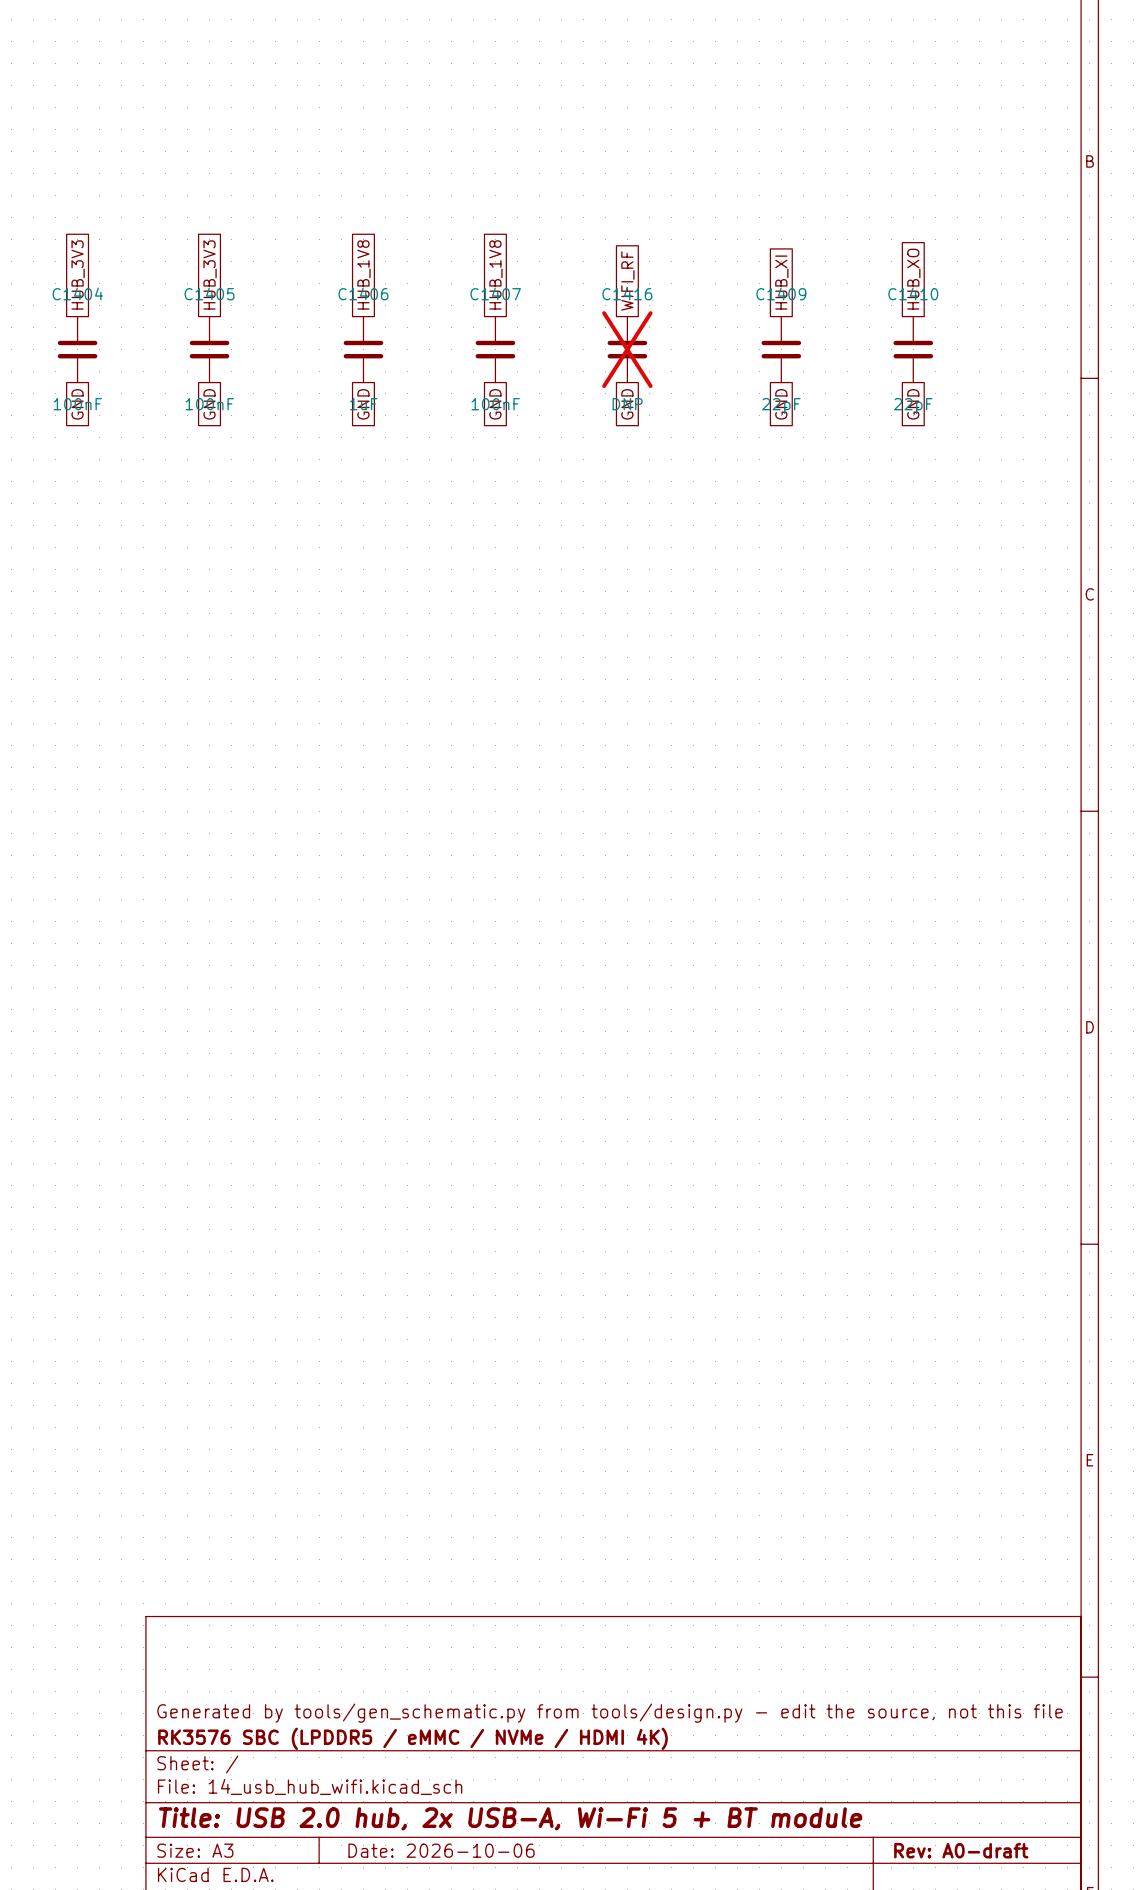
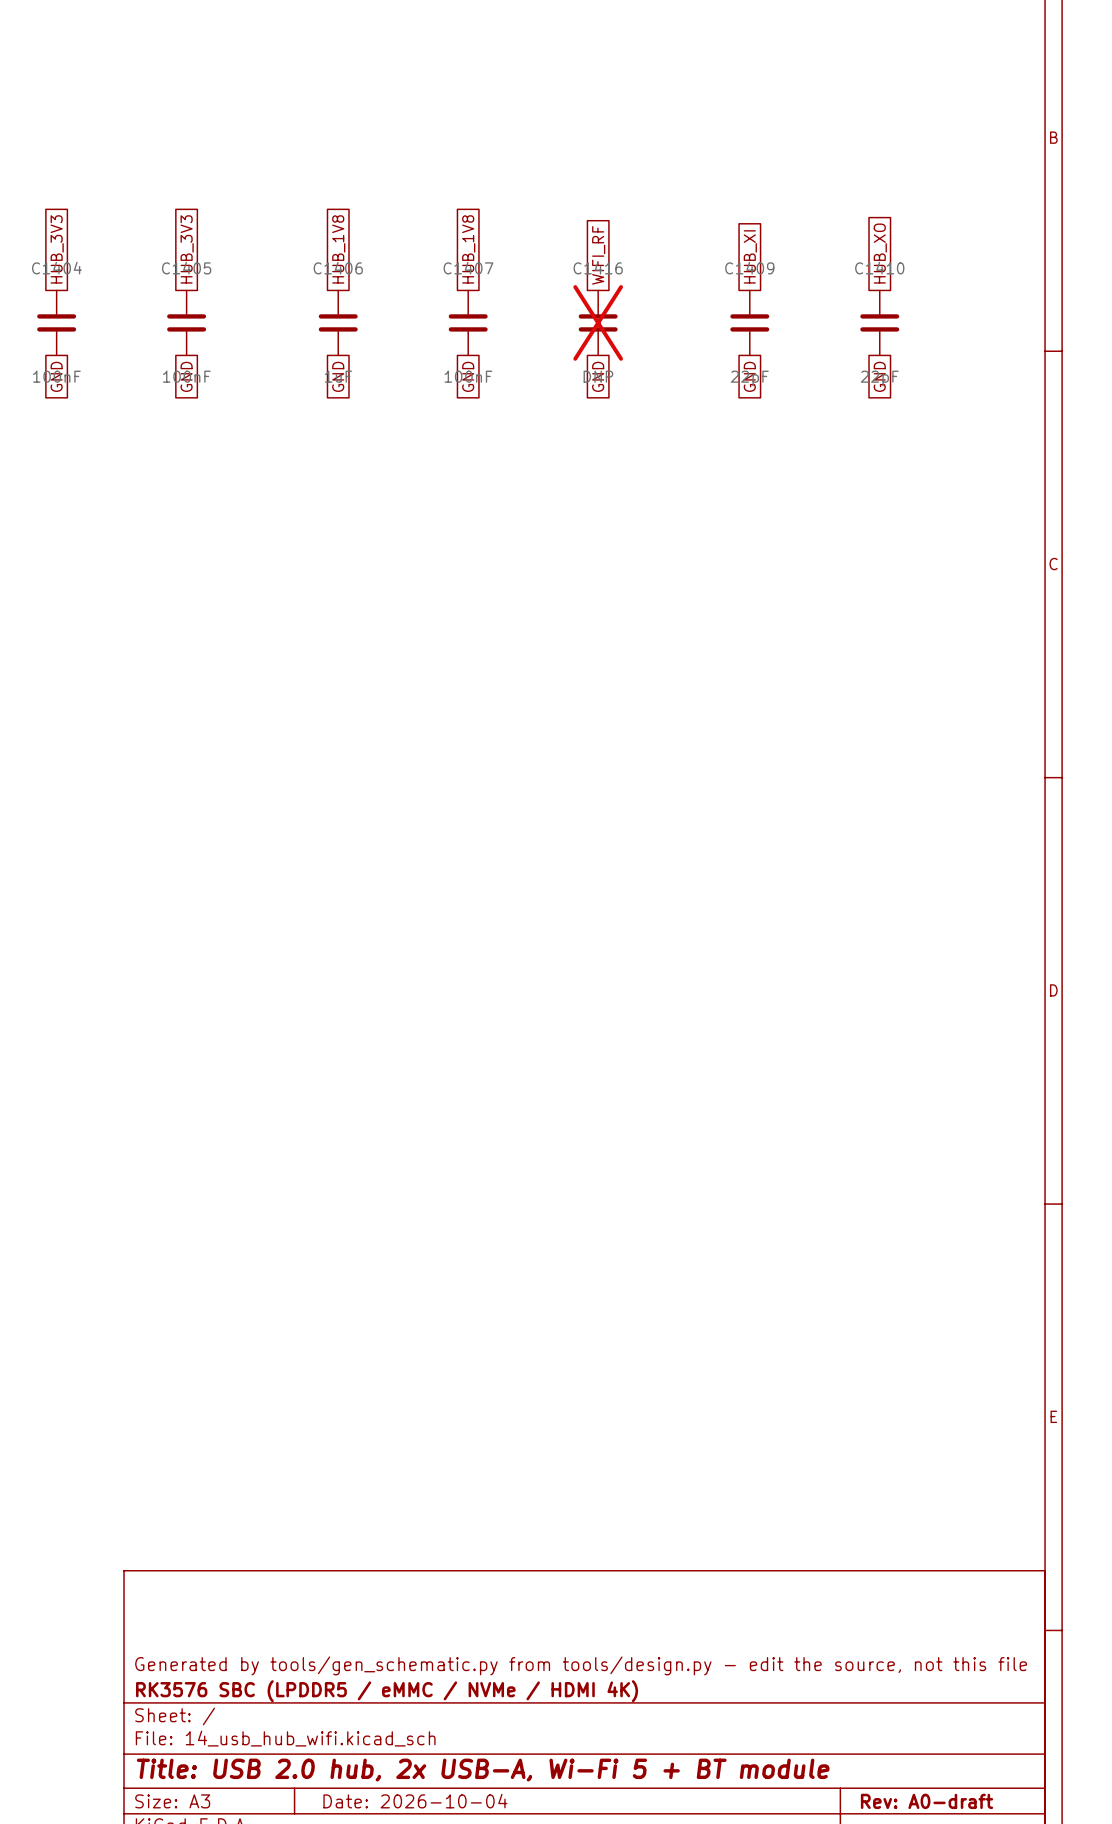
title block: Date: 2026-10-06 (441, 1850) -> Date: 2026-10-04 (415, 1801)

